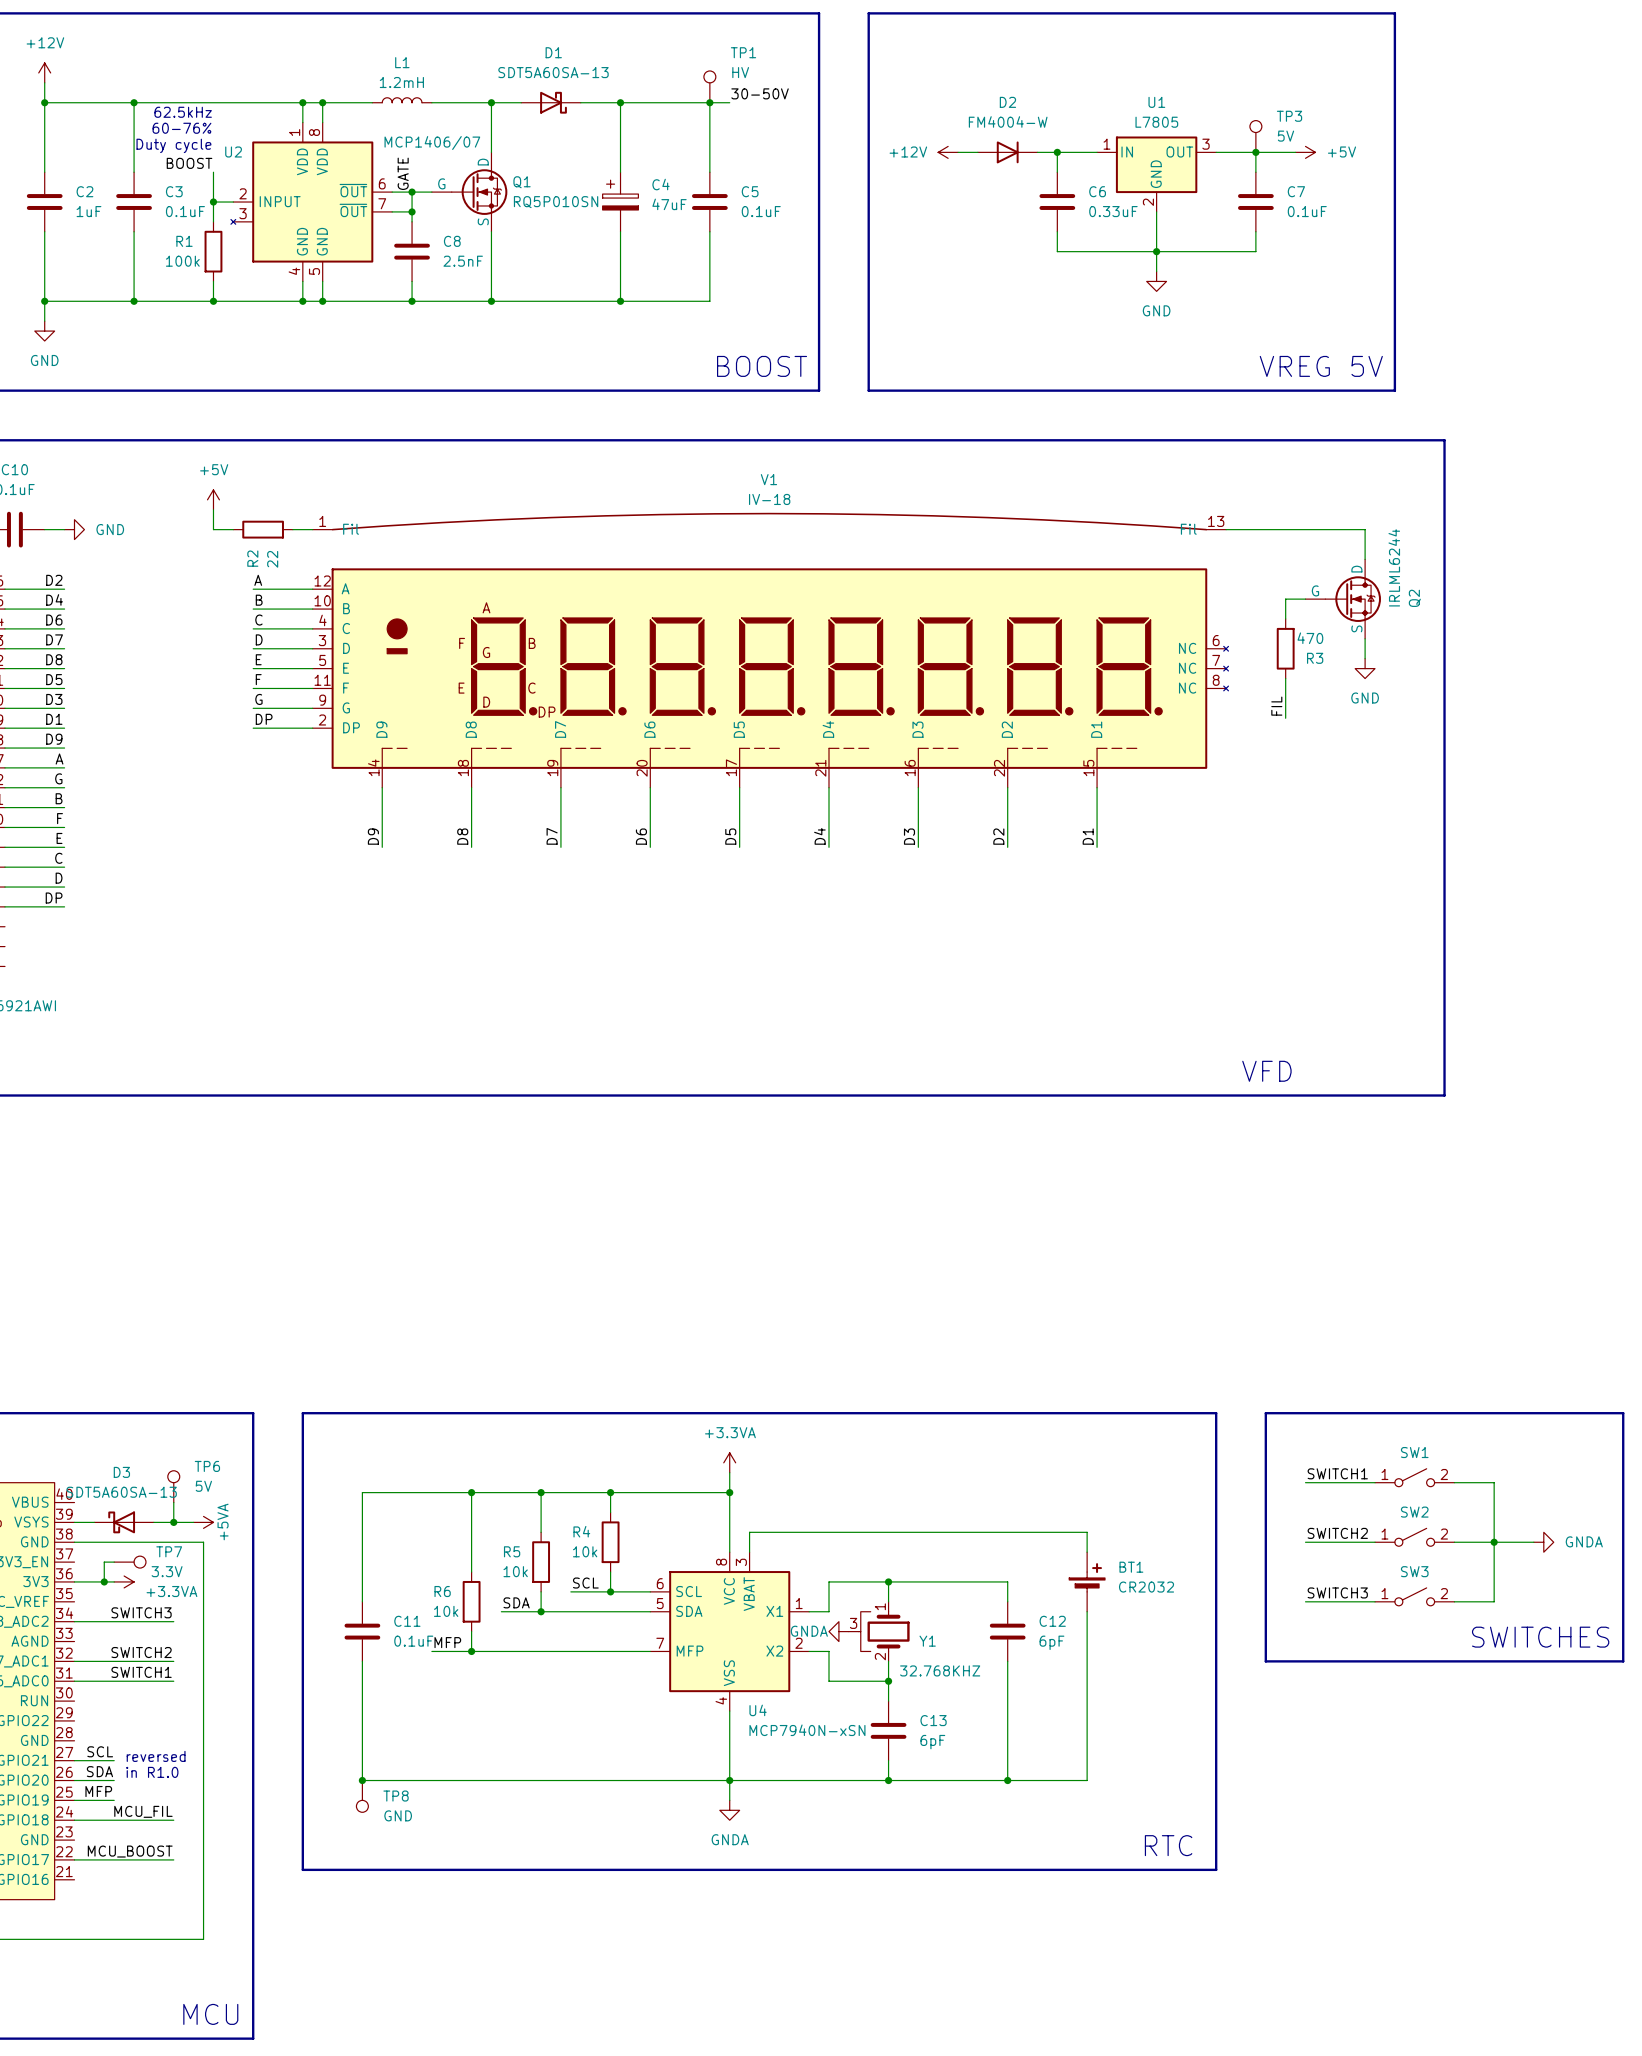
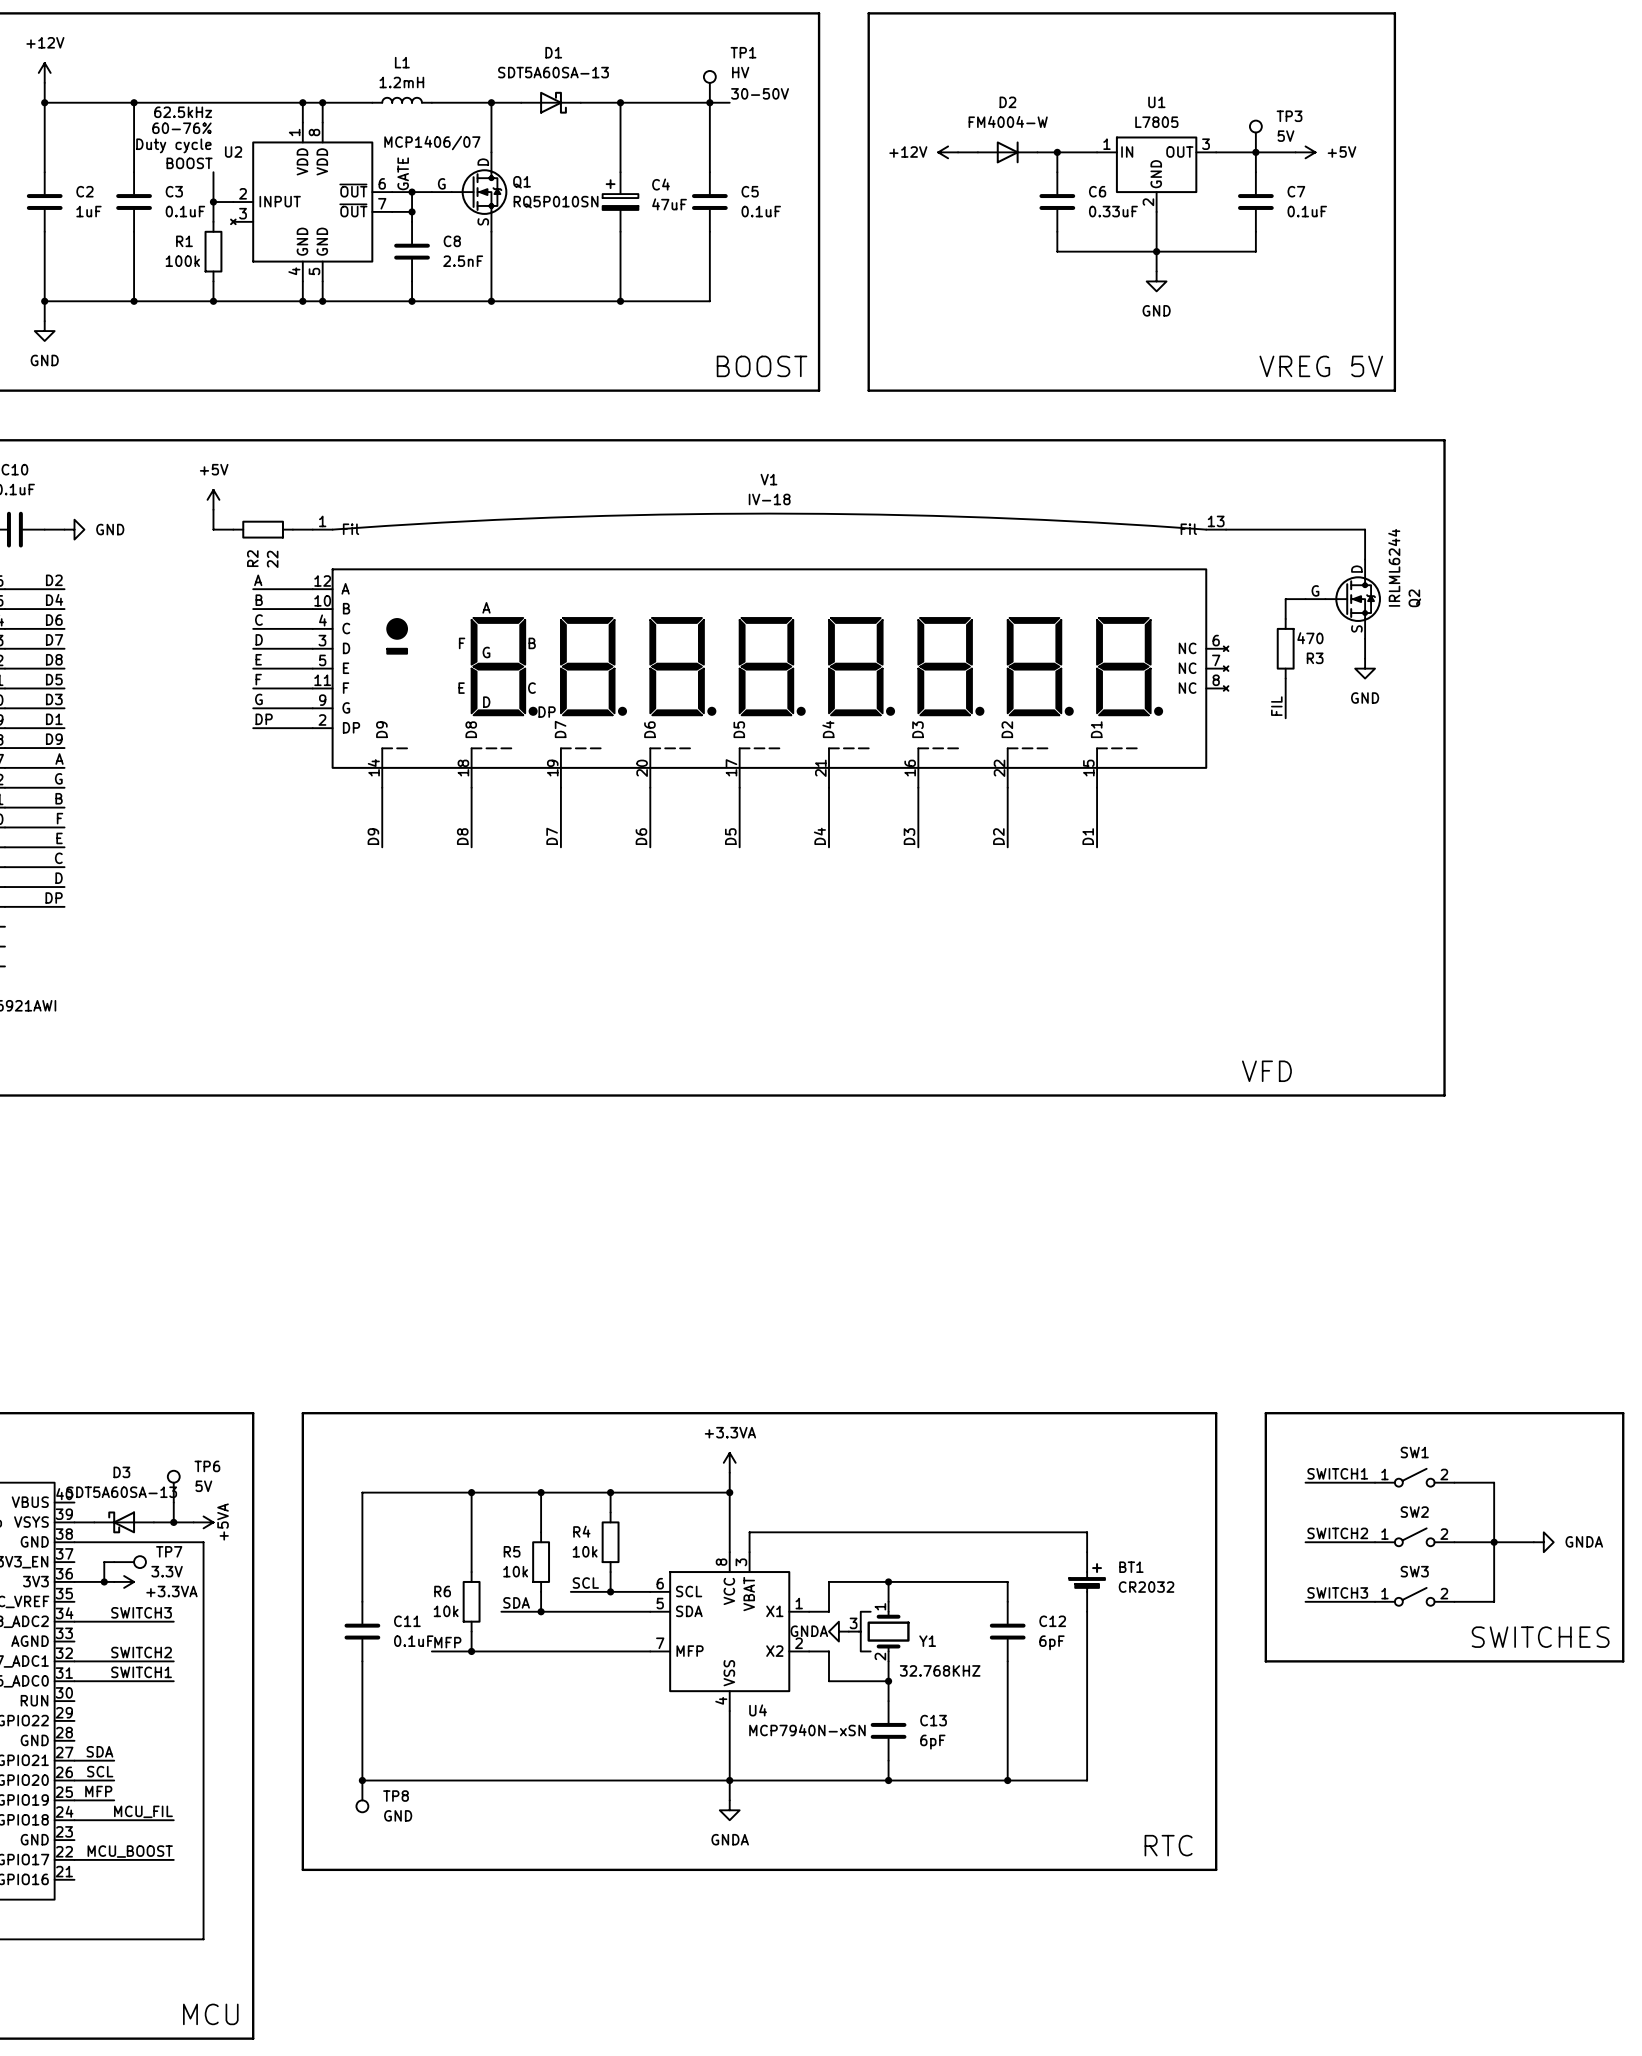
label: SCL (100, 1751) -> SDA (99, 1751)
text: reversed (156, 1756) -> none
label: SDA (99, 1771) -> SCL (100, 1771)
text: in R1.0 (152, 1772) -> none

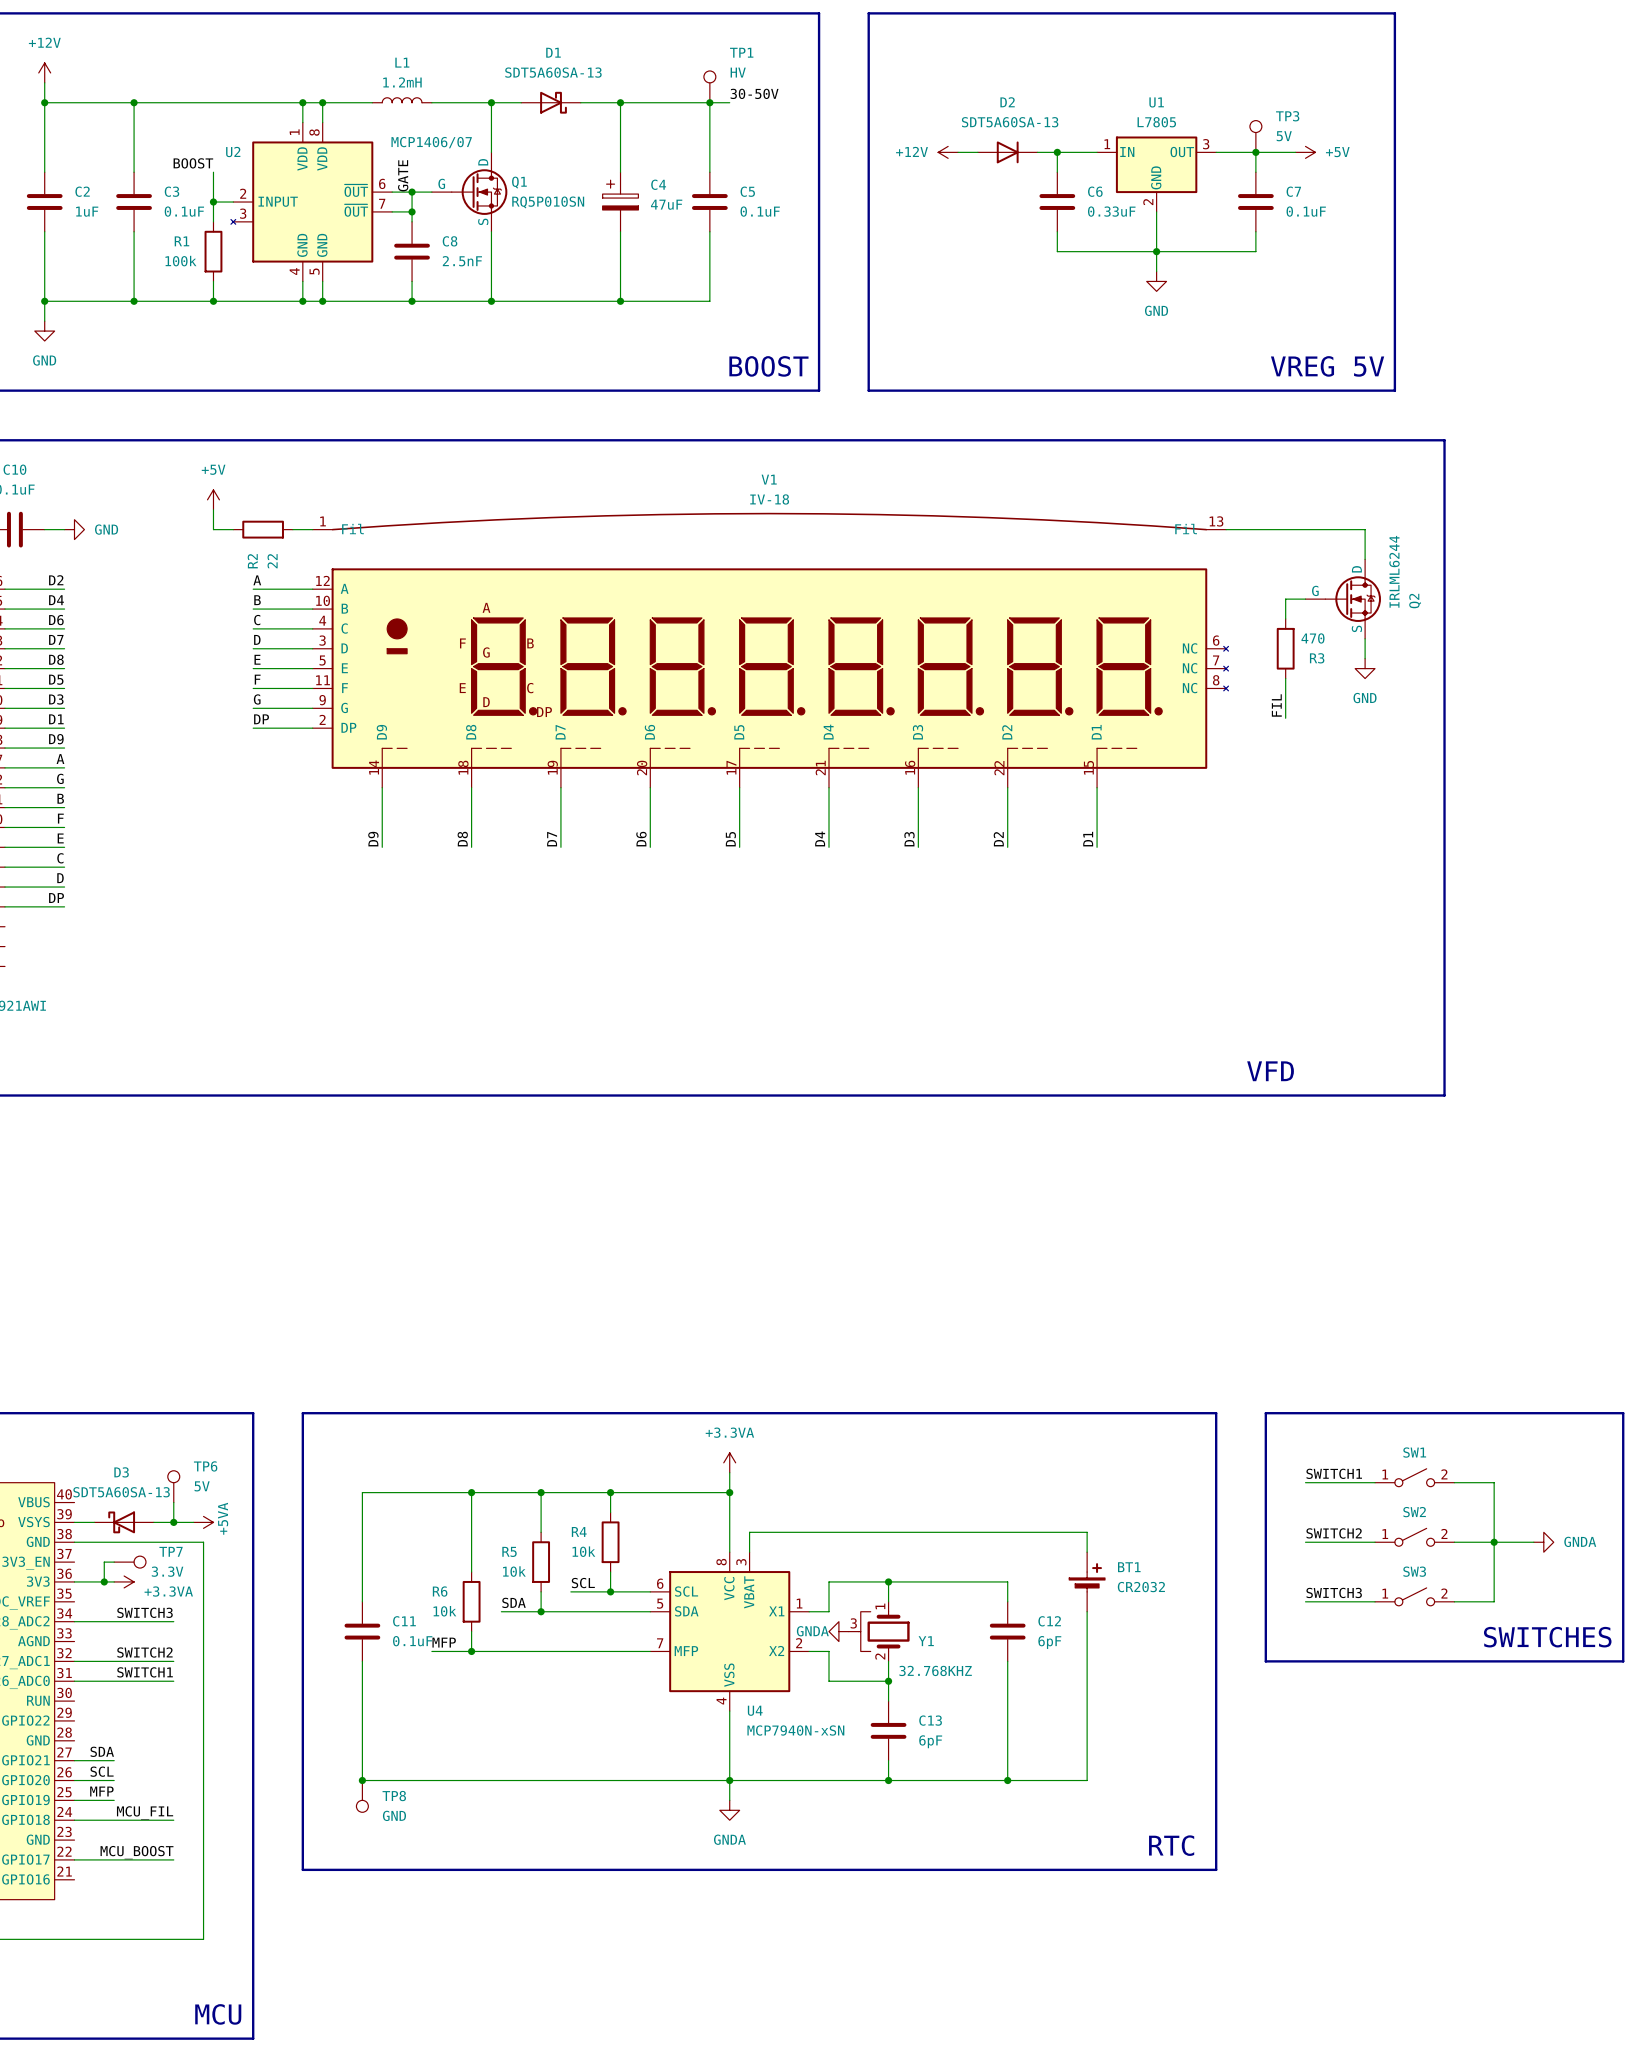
text: 62.5kHz (183, 112) -> none
D2 value: FM4004-W (1008, 121) -> SDT5A60SA-13 (1010, 122)
text: 60-76% (181, 128) -> none
text: Duty cycle (173, 145) -> none

